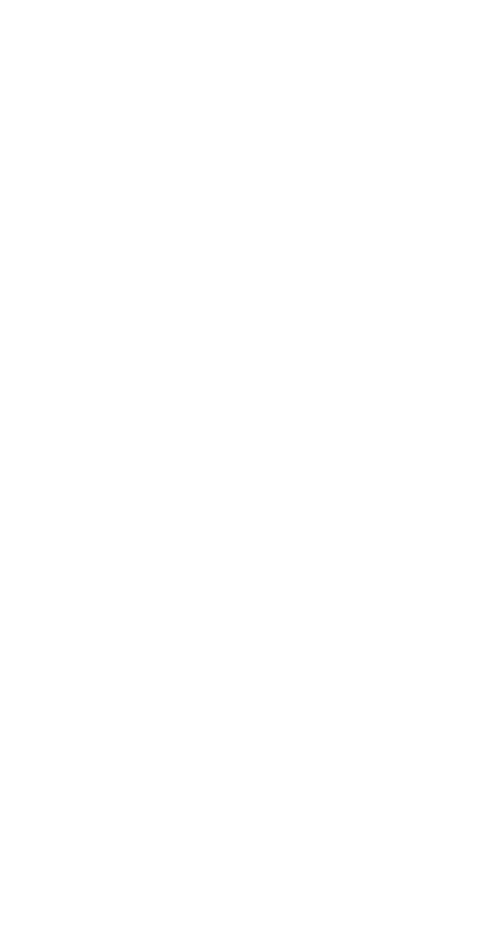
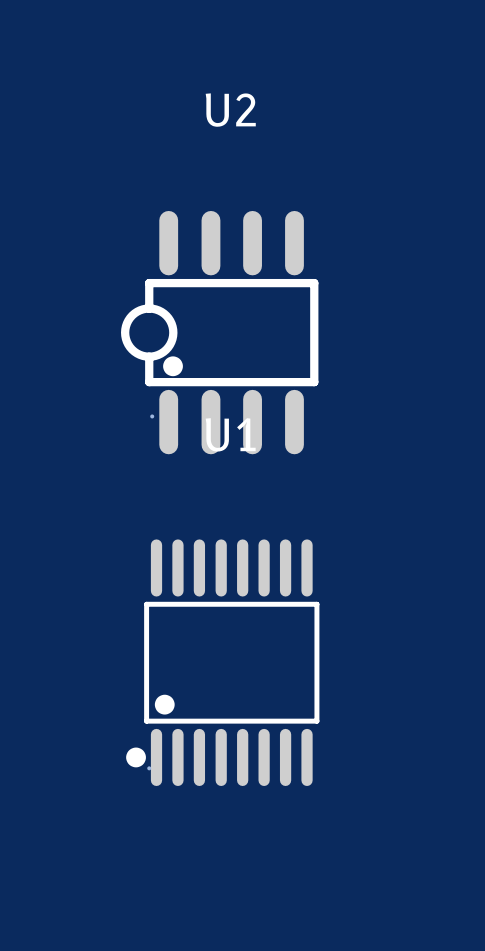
U2: none -> (219, 332)
part: none -> (222, 662)

